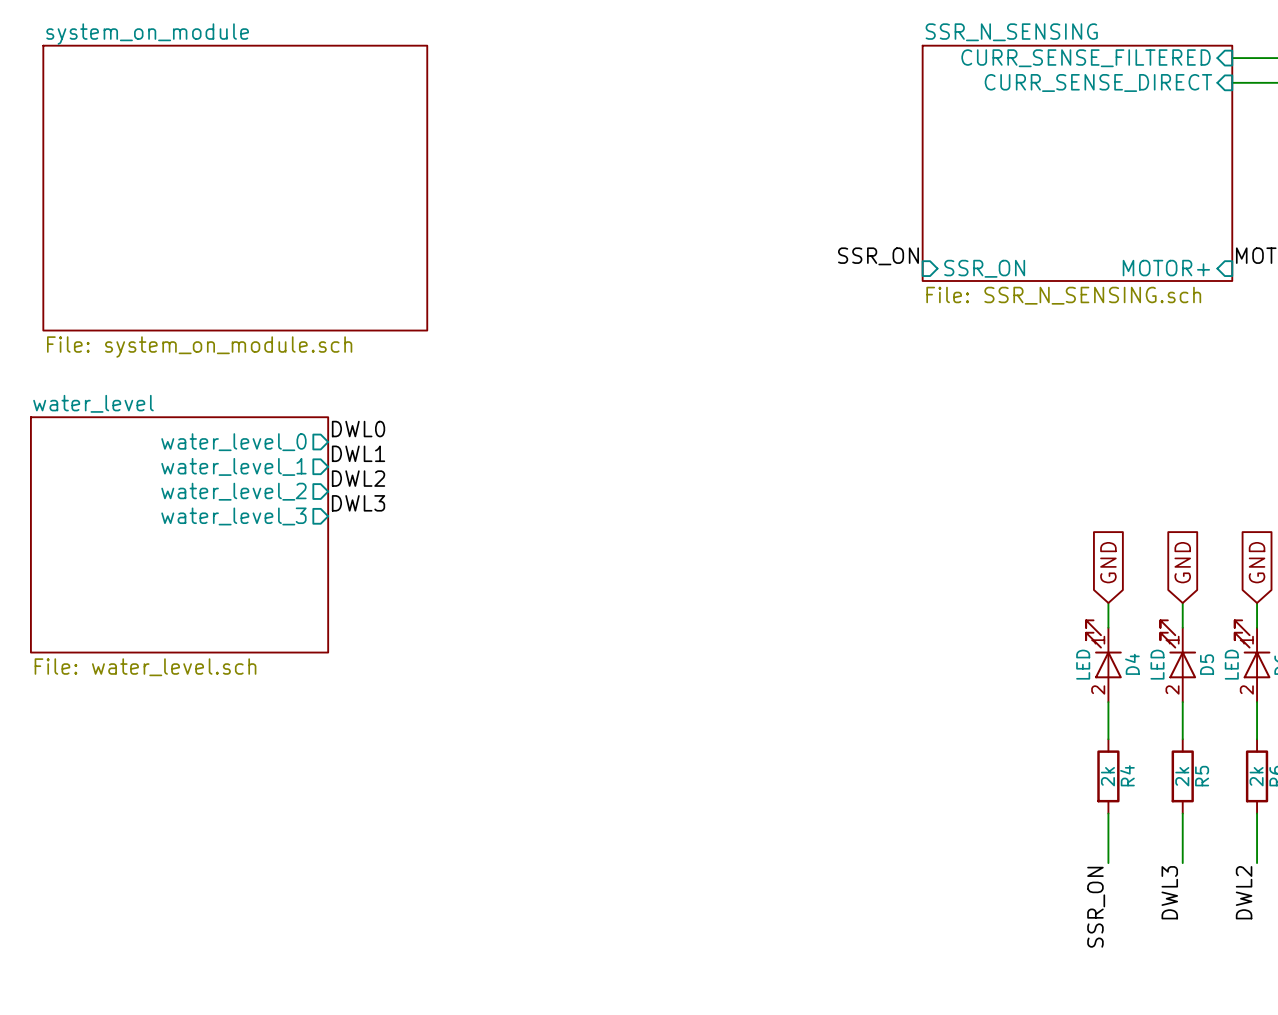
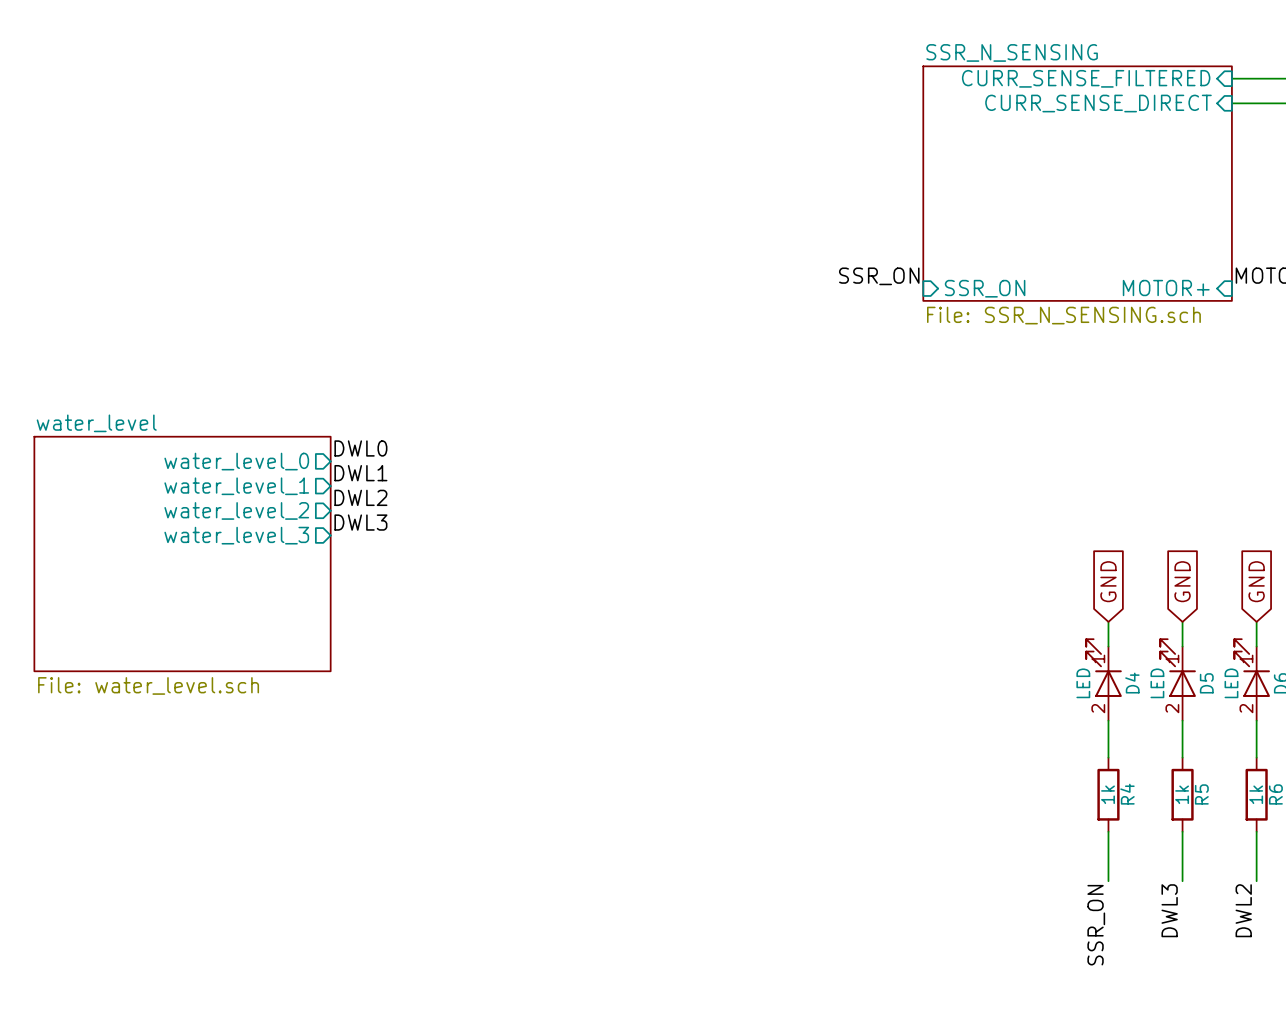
sheet system_on_module: File: system_on_module.sch (235, 188) -> none
R4 value: 2k (1107, 776) -> 1k (1108, 794)
R5 value: 2k (1182, 776) -> 1k (1182, 794)
R6 value: 2k (1256, 776) -> 1k (1256, 794)

